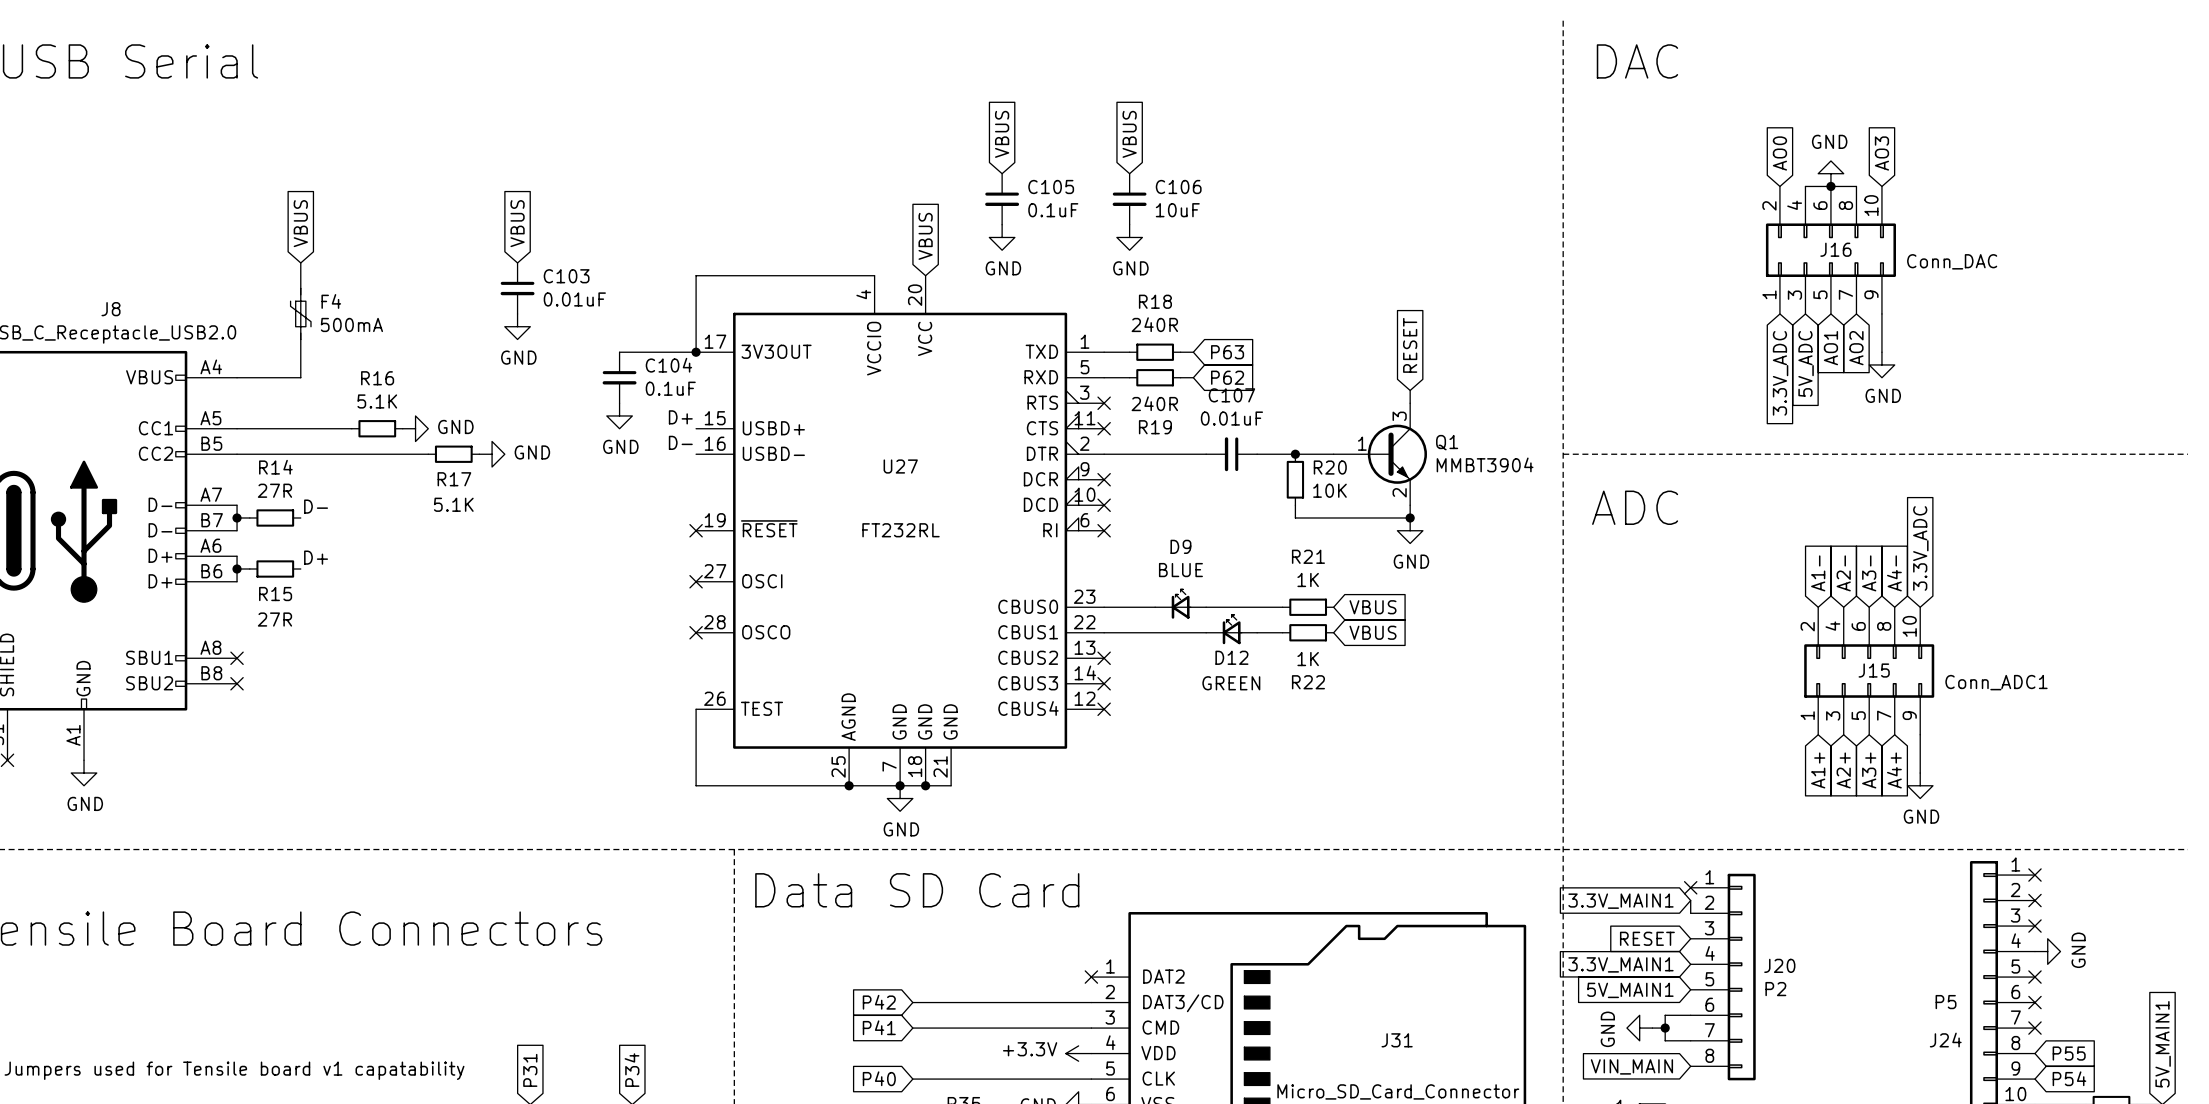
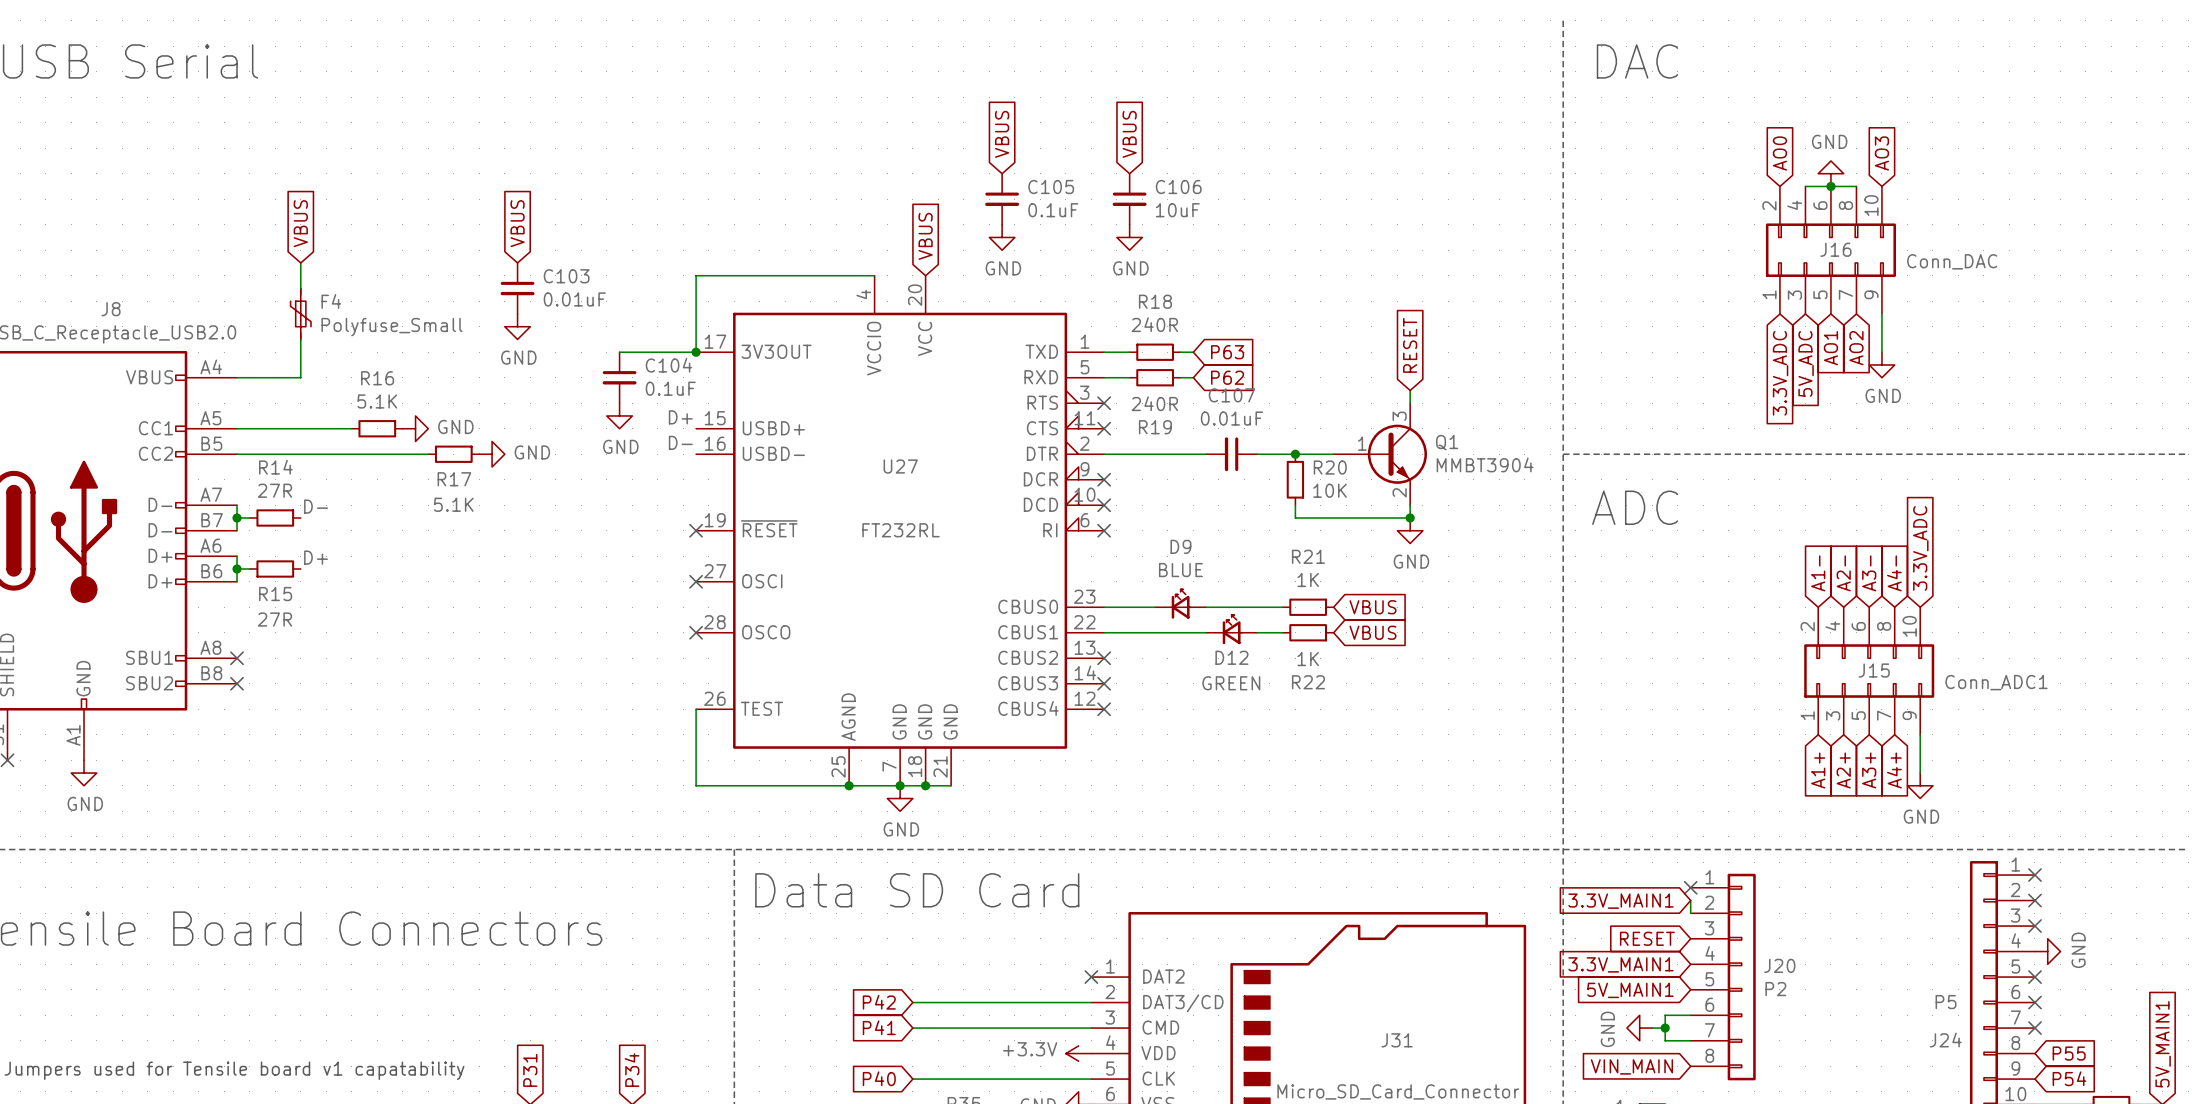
F4 value: 500mA (351, 324) -> Polyfuse_Small (392, 327)

